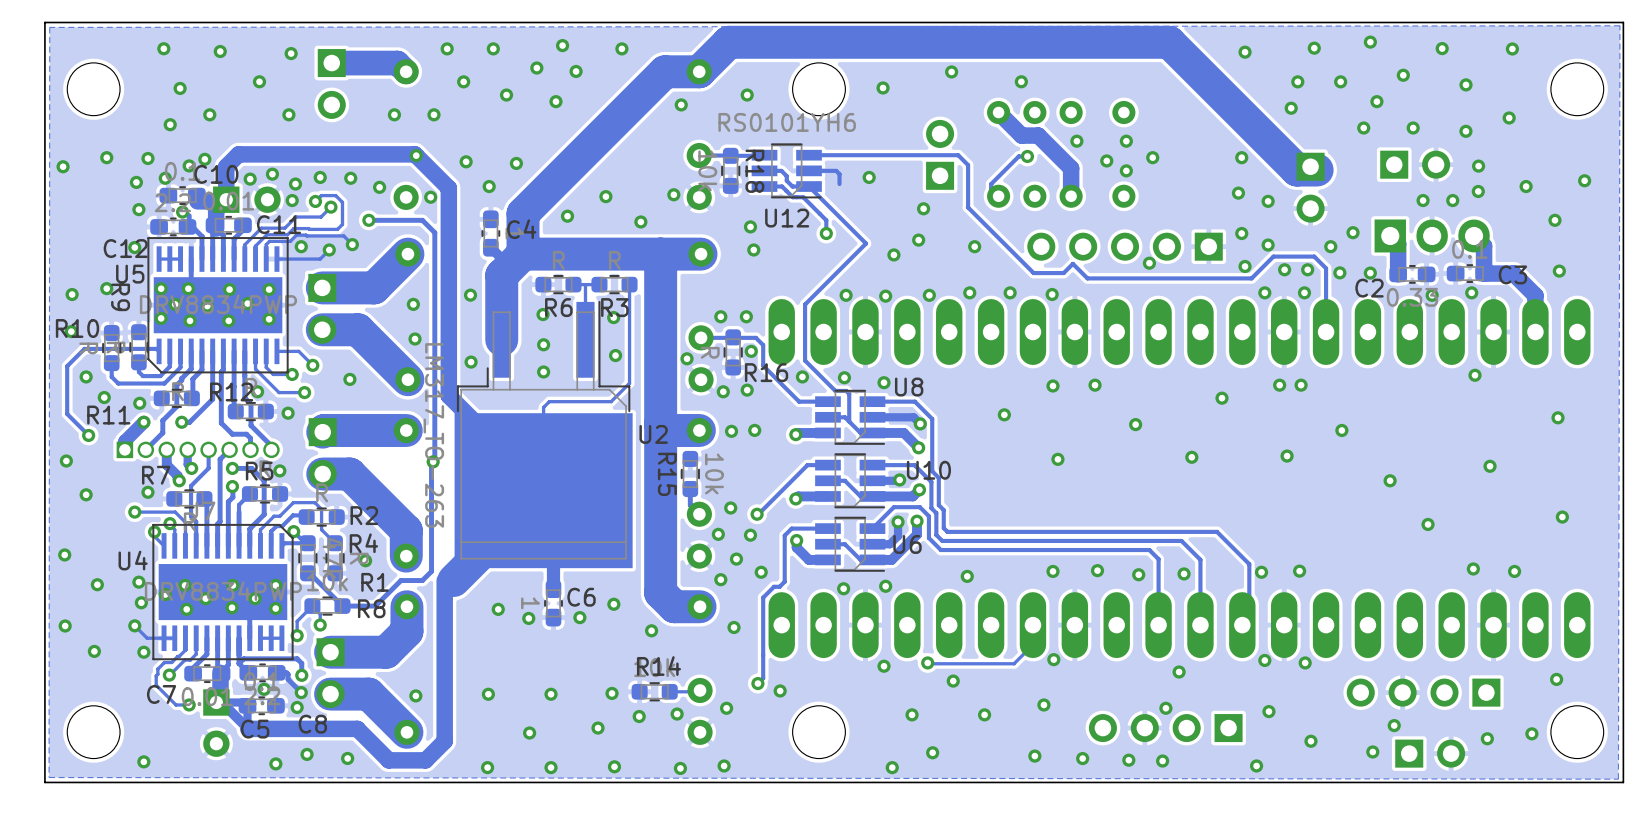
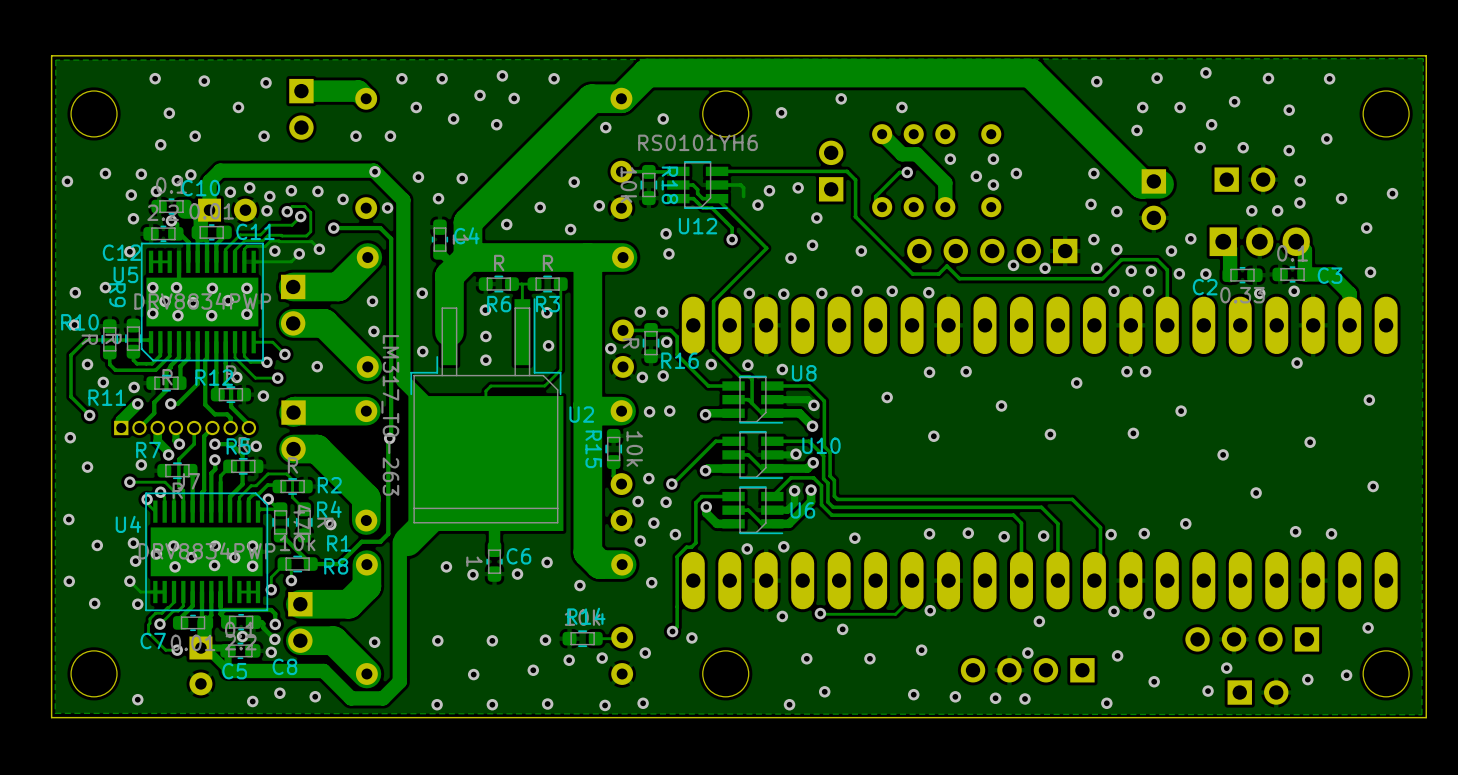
via: none -> (574, 182)
via: none -> (798, 187)
via: none -> (757, 205)
via: none -> (1045, 268)
via: none -> (1185, 523)

